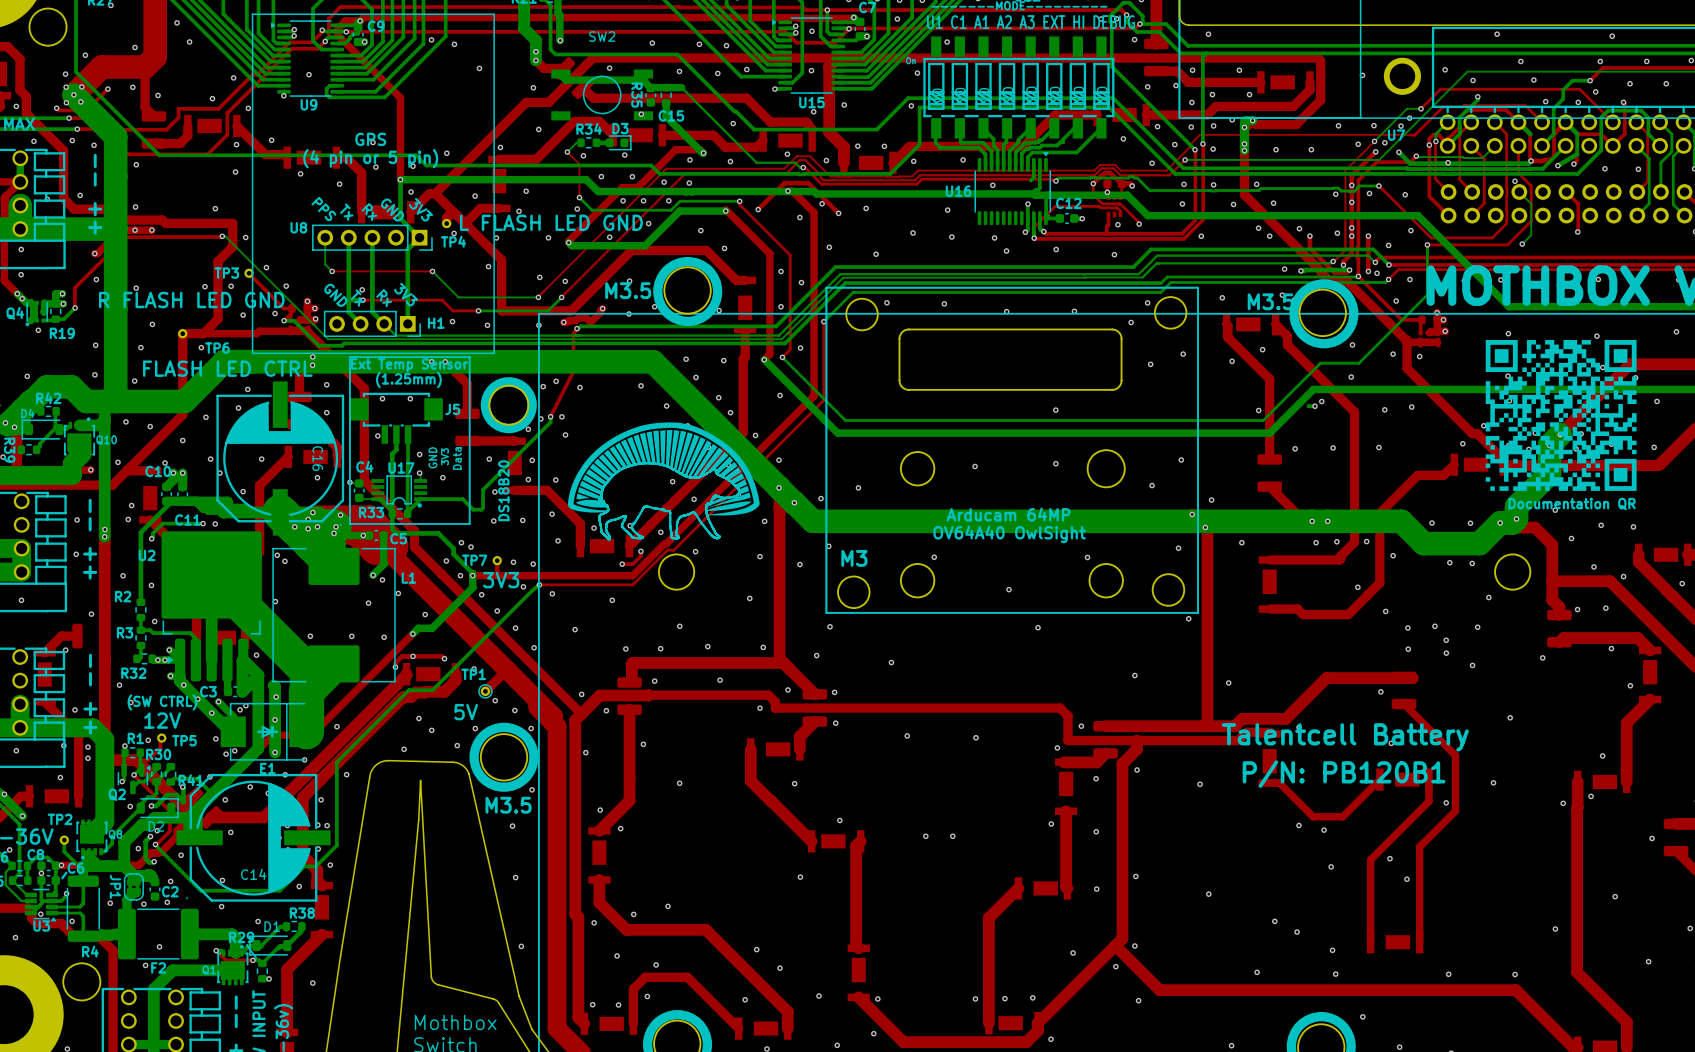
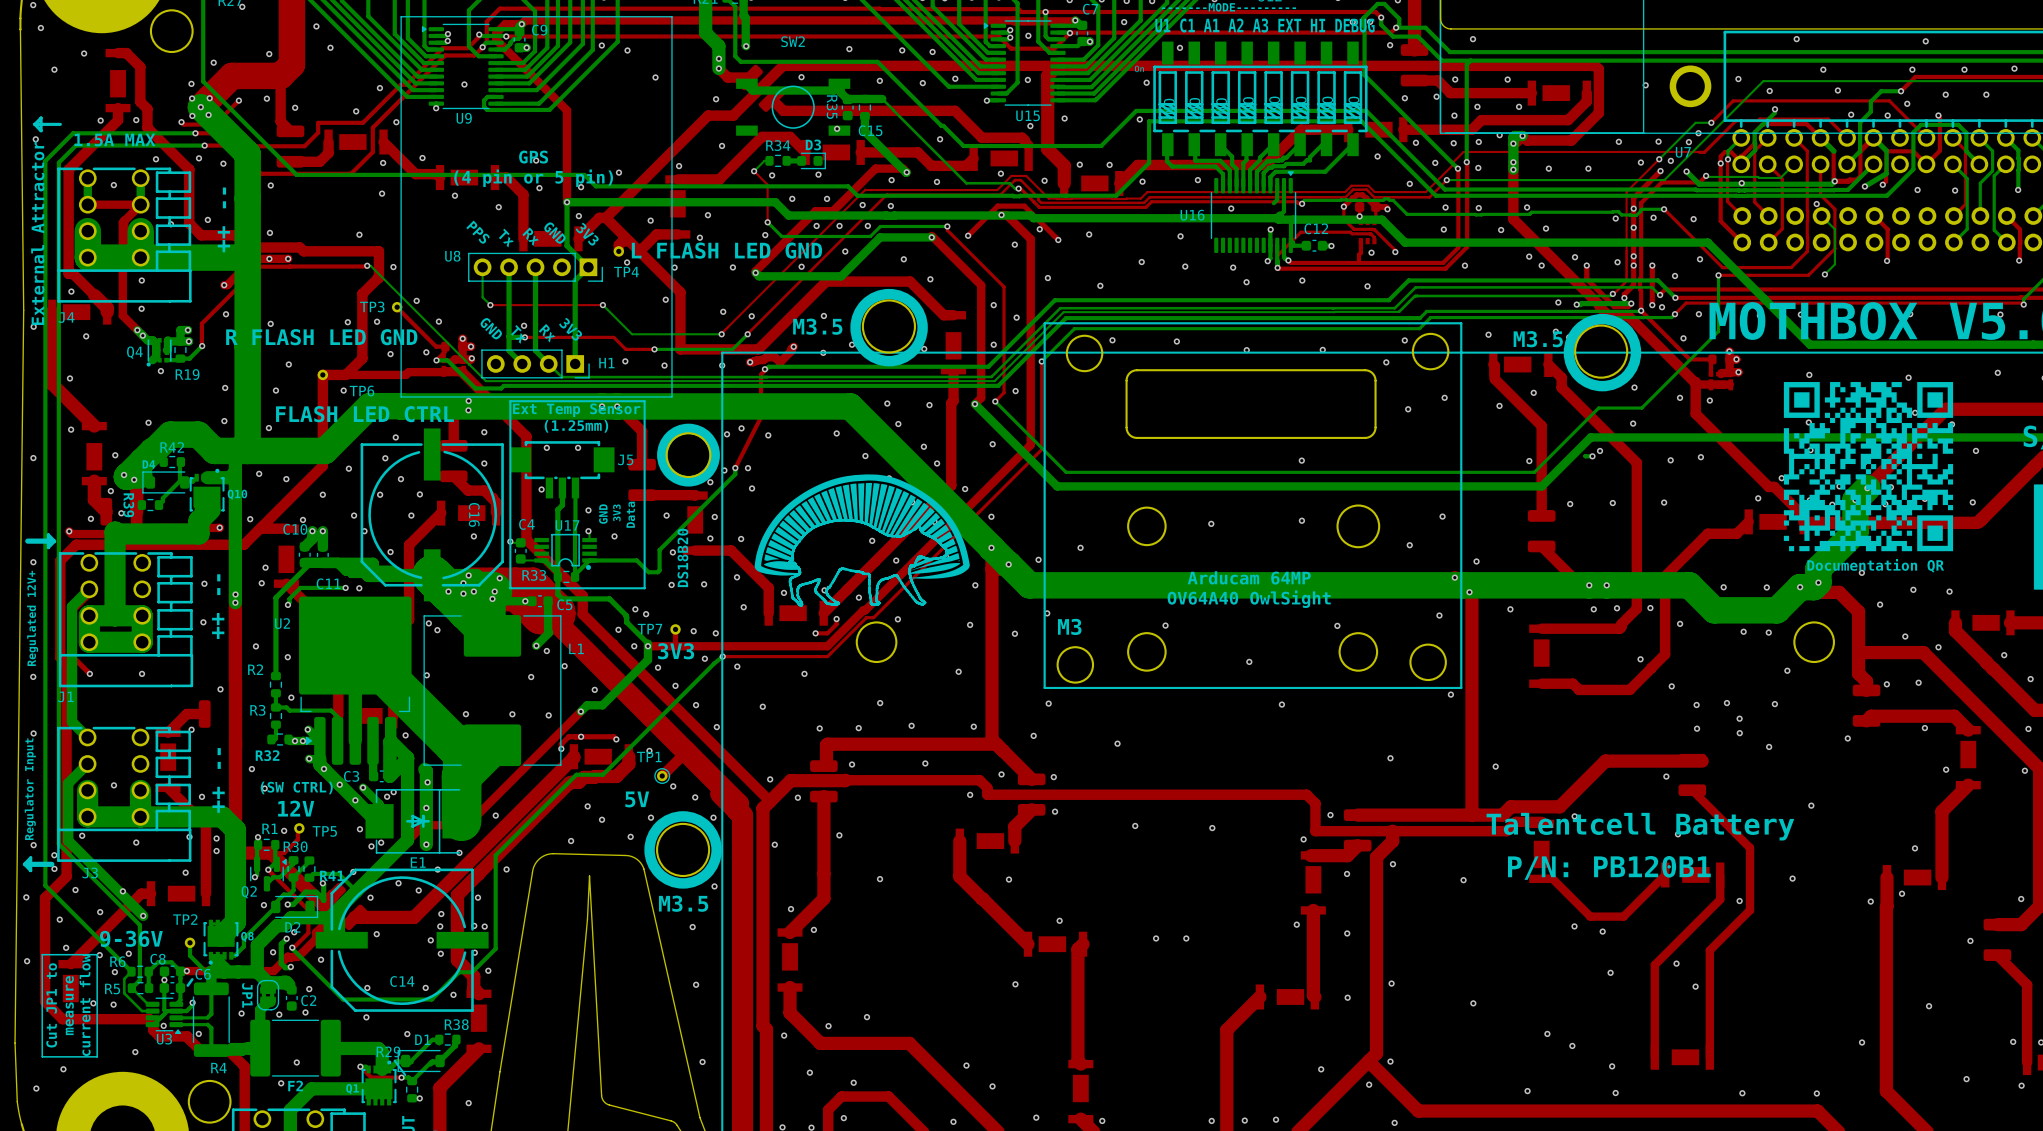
C16 footprint: [216, 381, 345, 536] -> [360, 428, 504, 602]
C14 footprint: [176, 773, 331, 902] -> [315, 868, 489, 1012]

